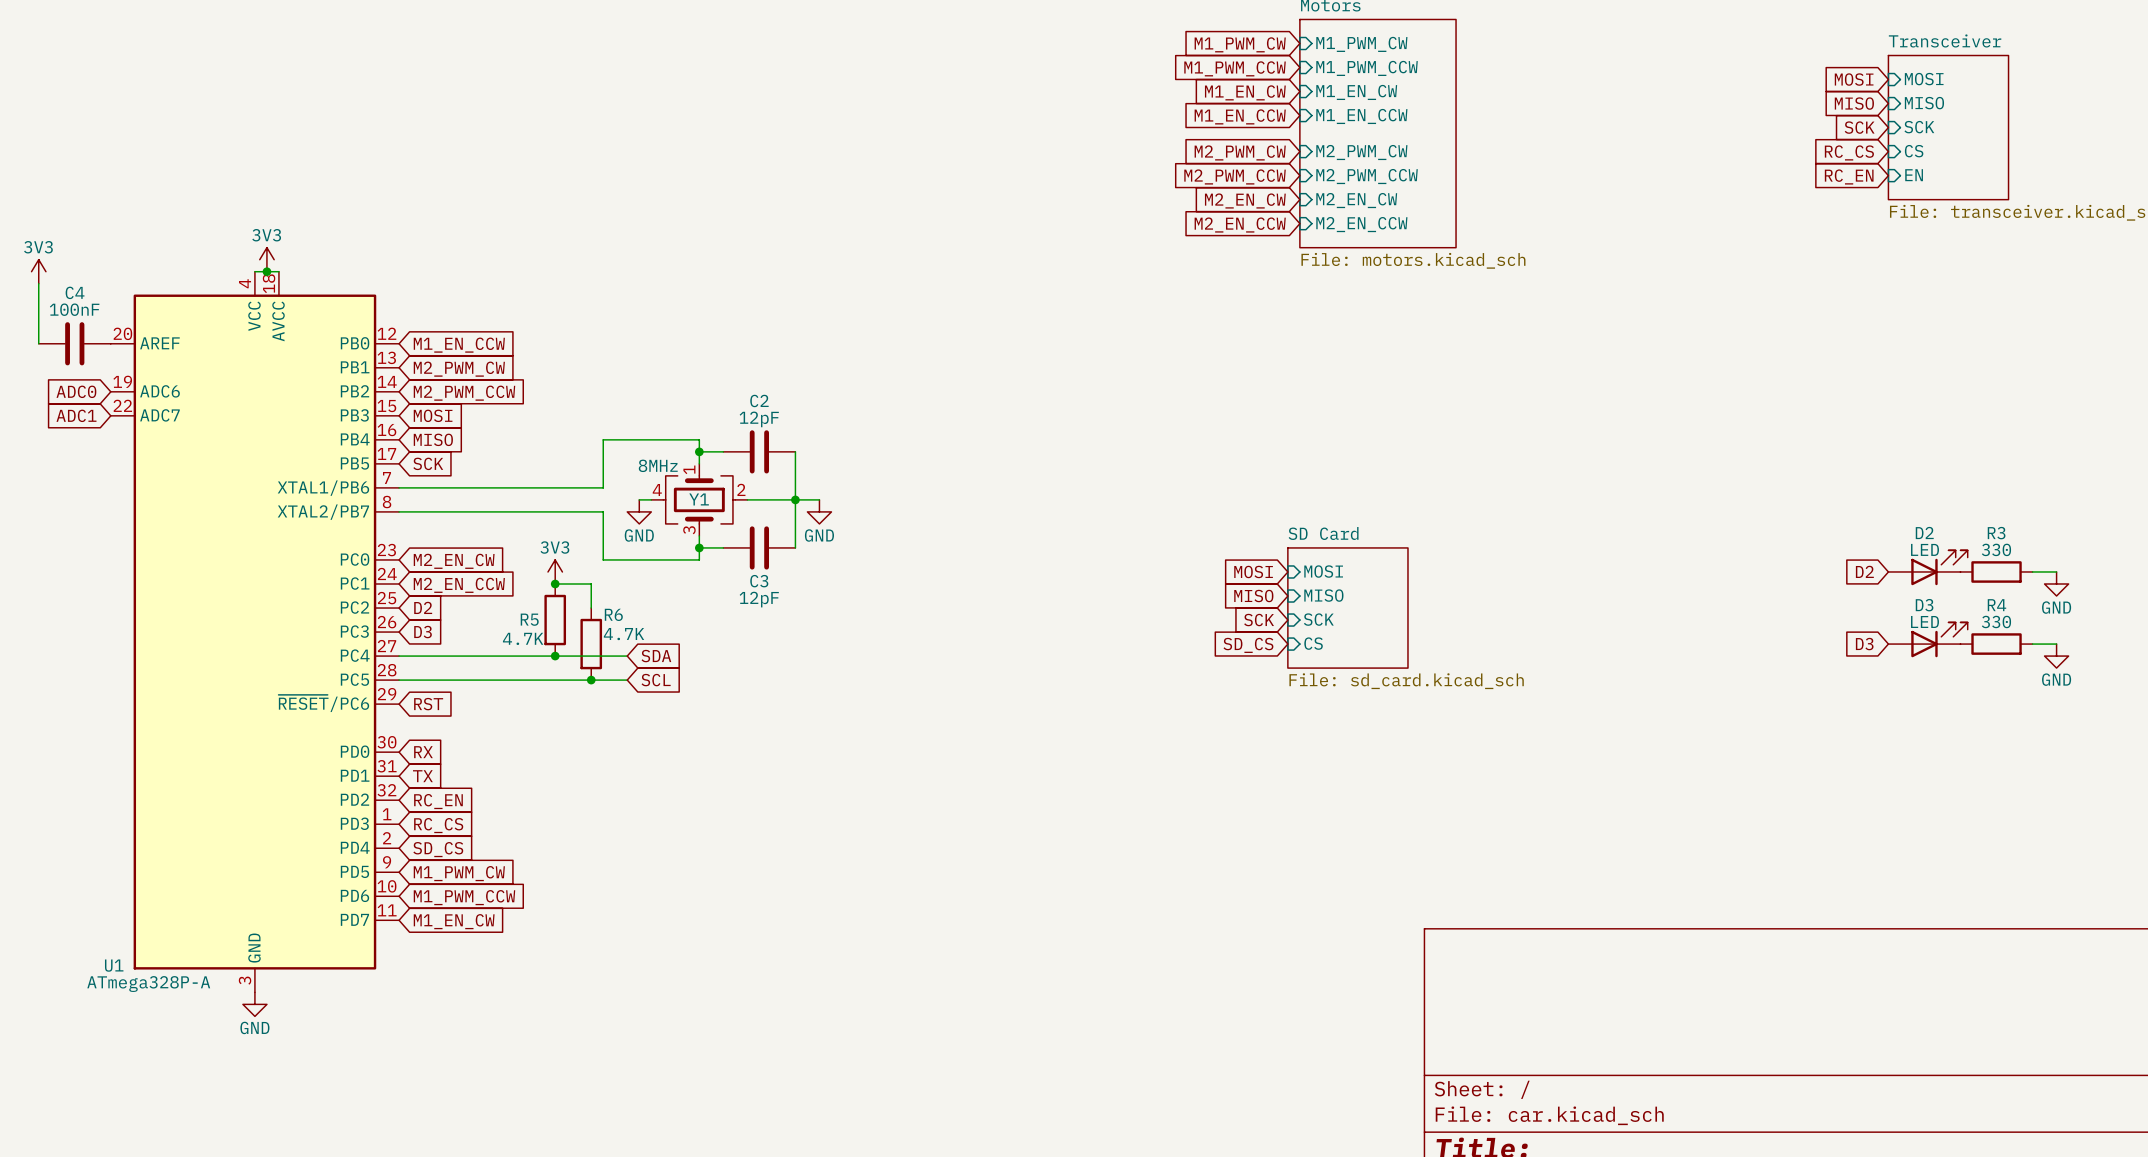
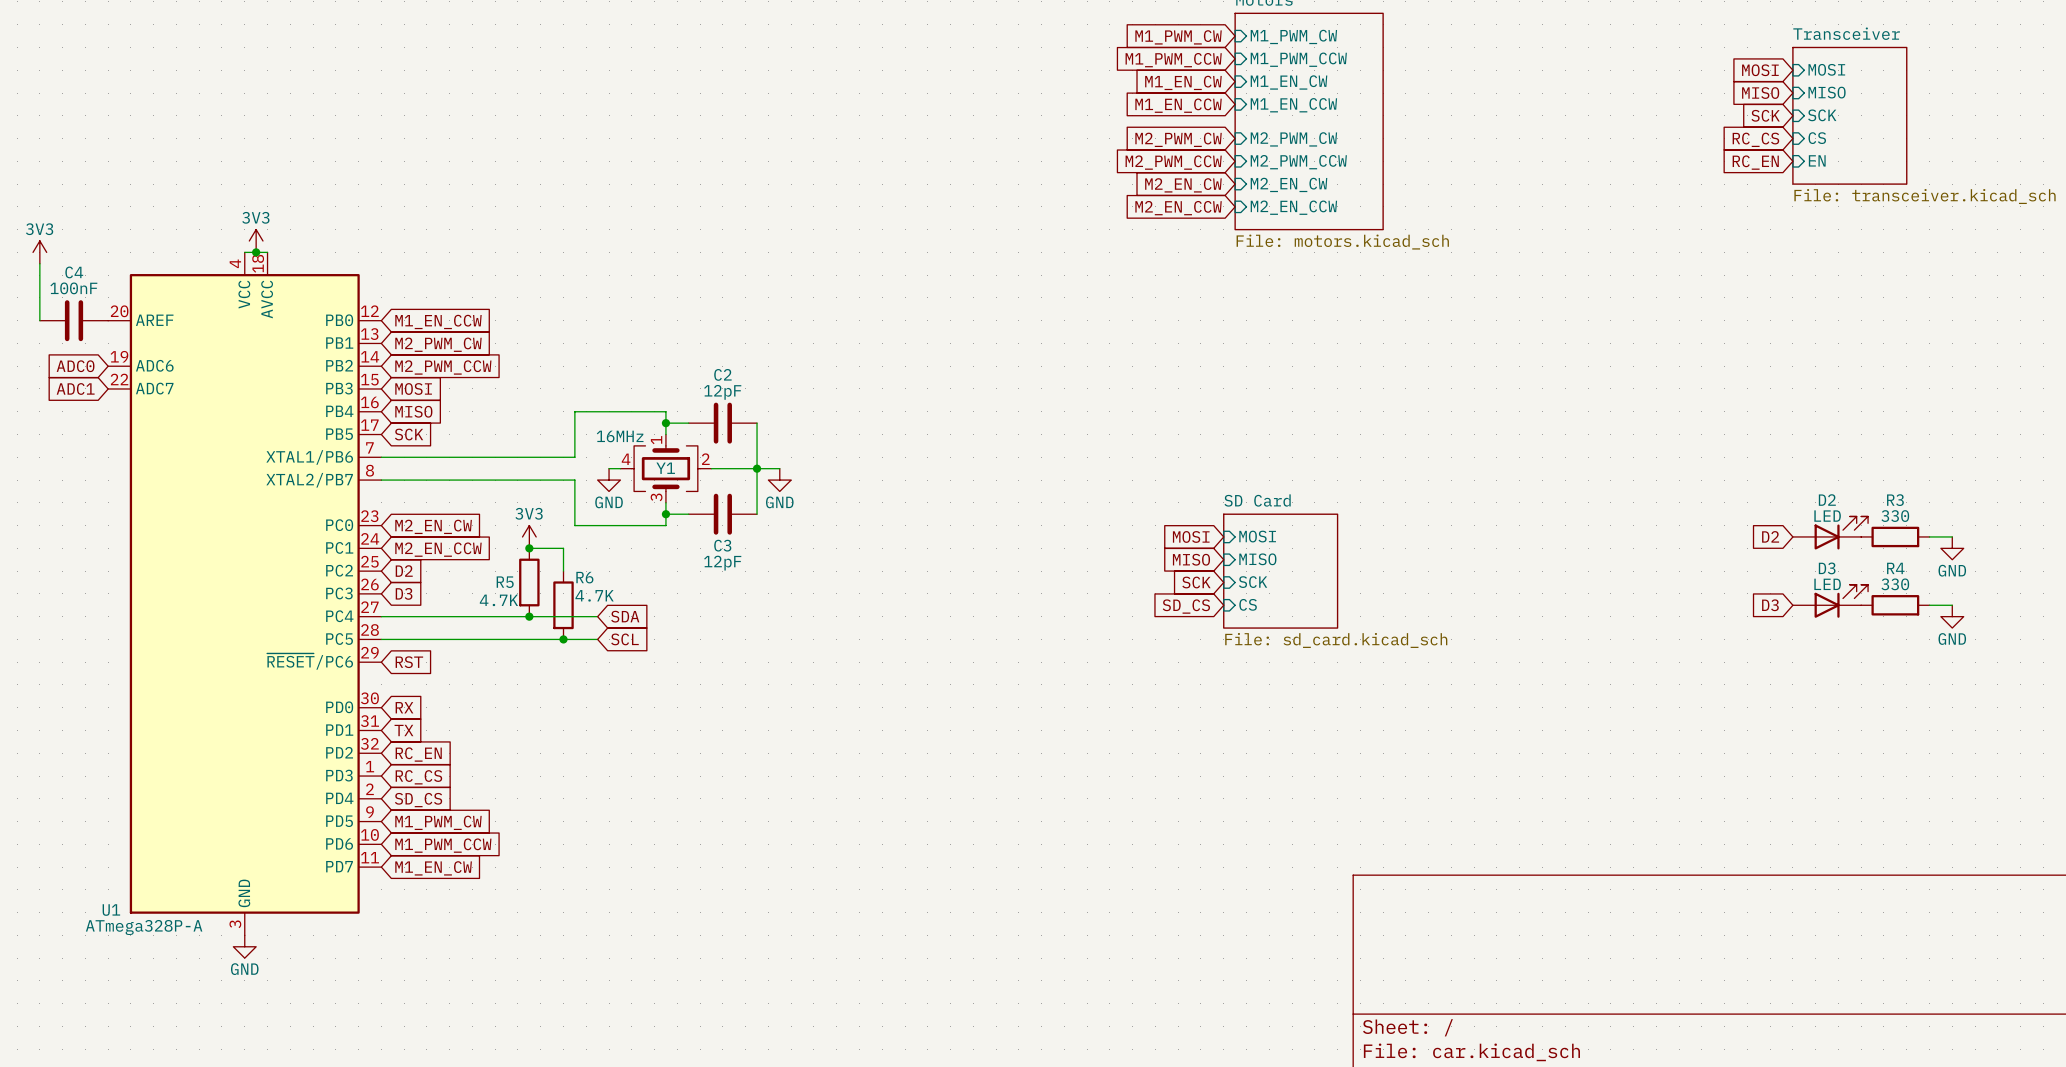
Y1 value: 8MHz (658, 465) -> 16MHz (620, 436)

